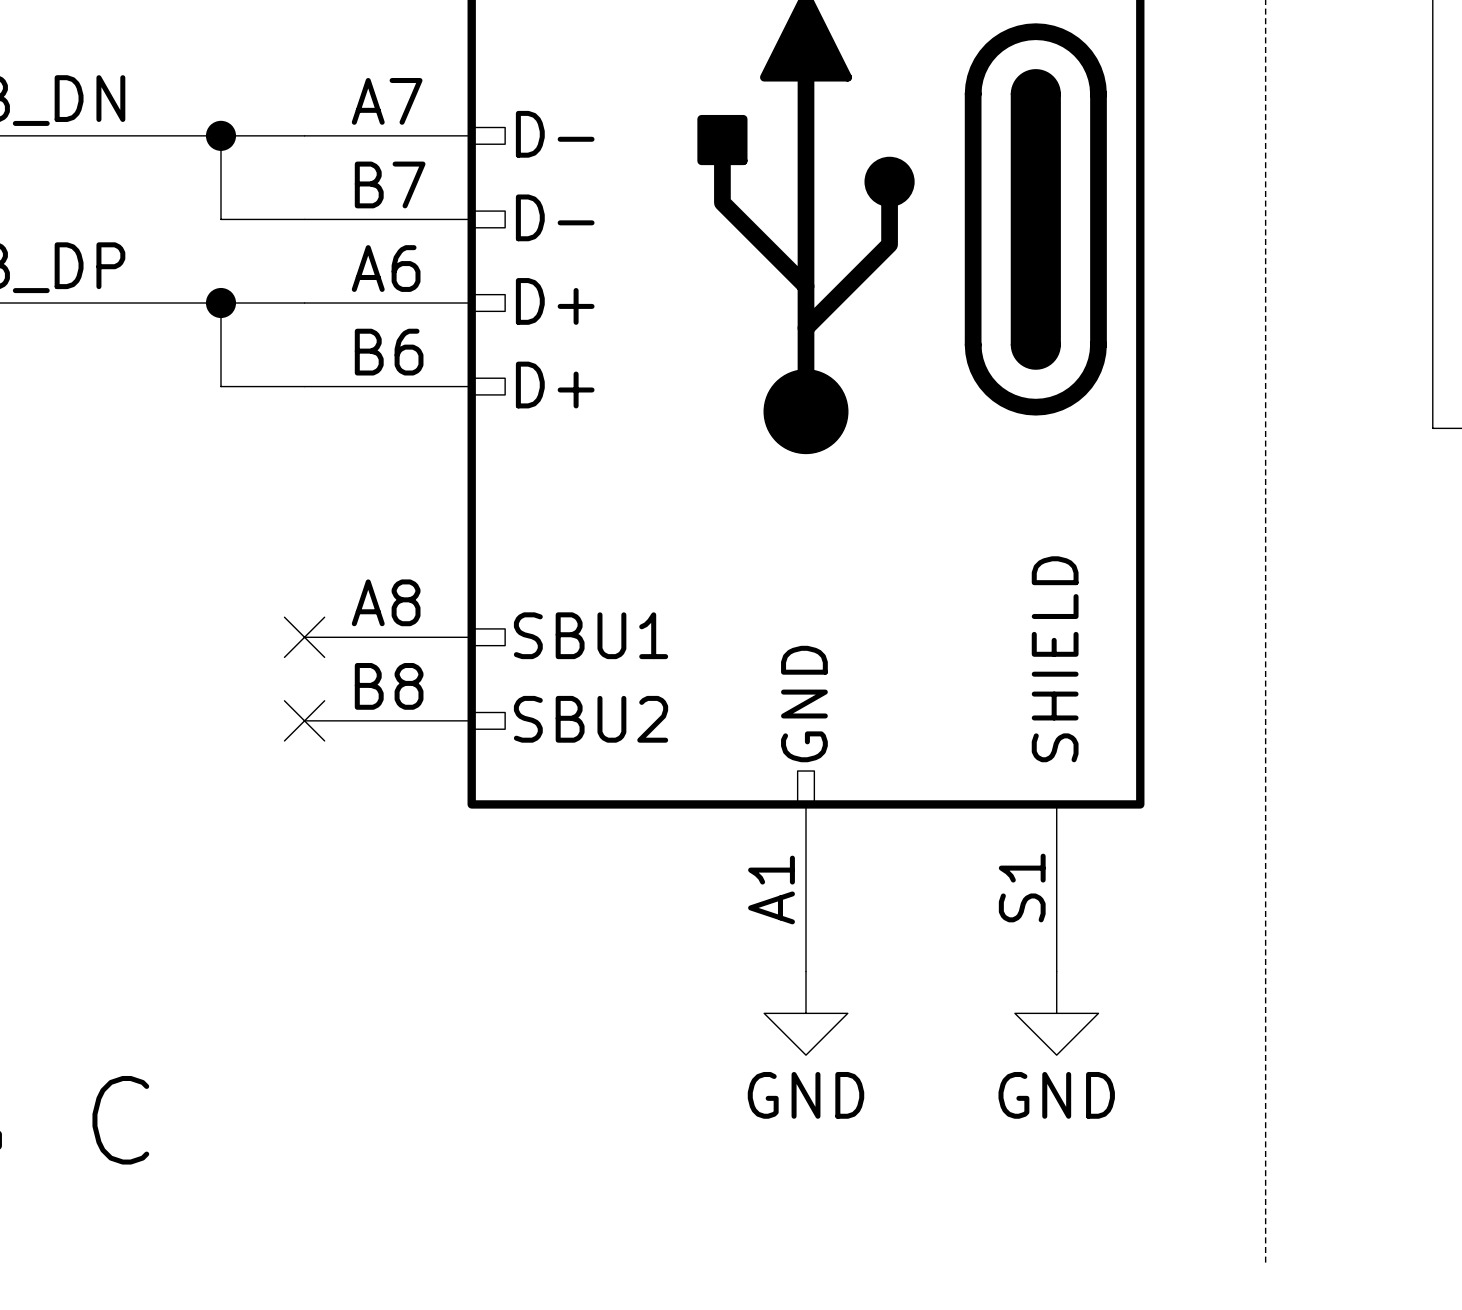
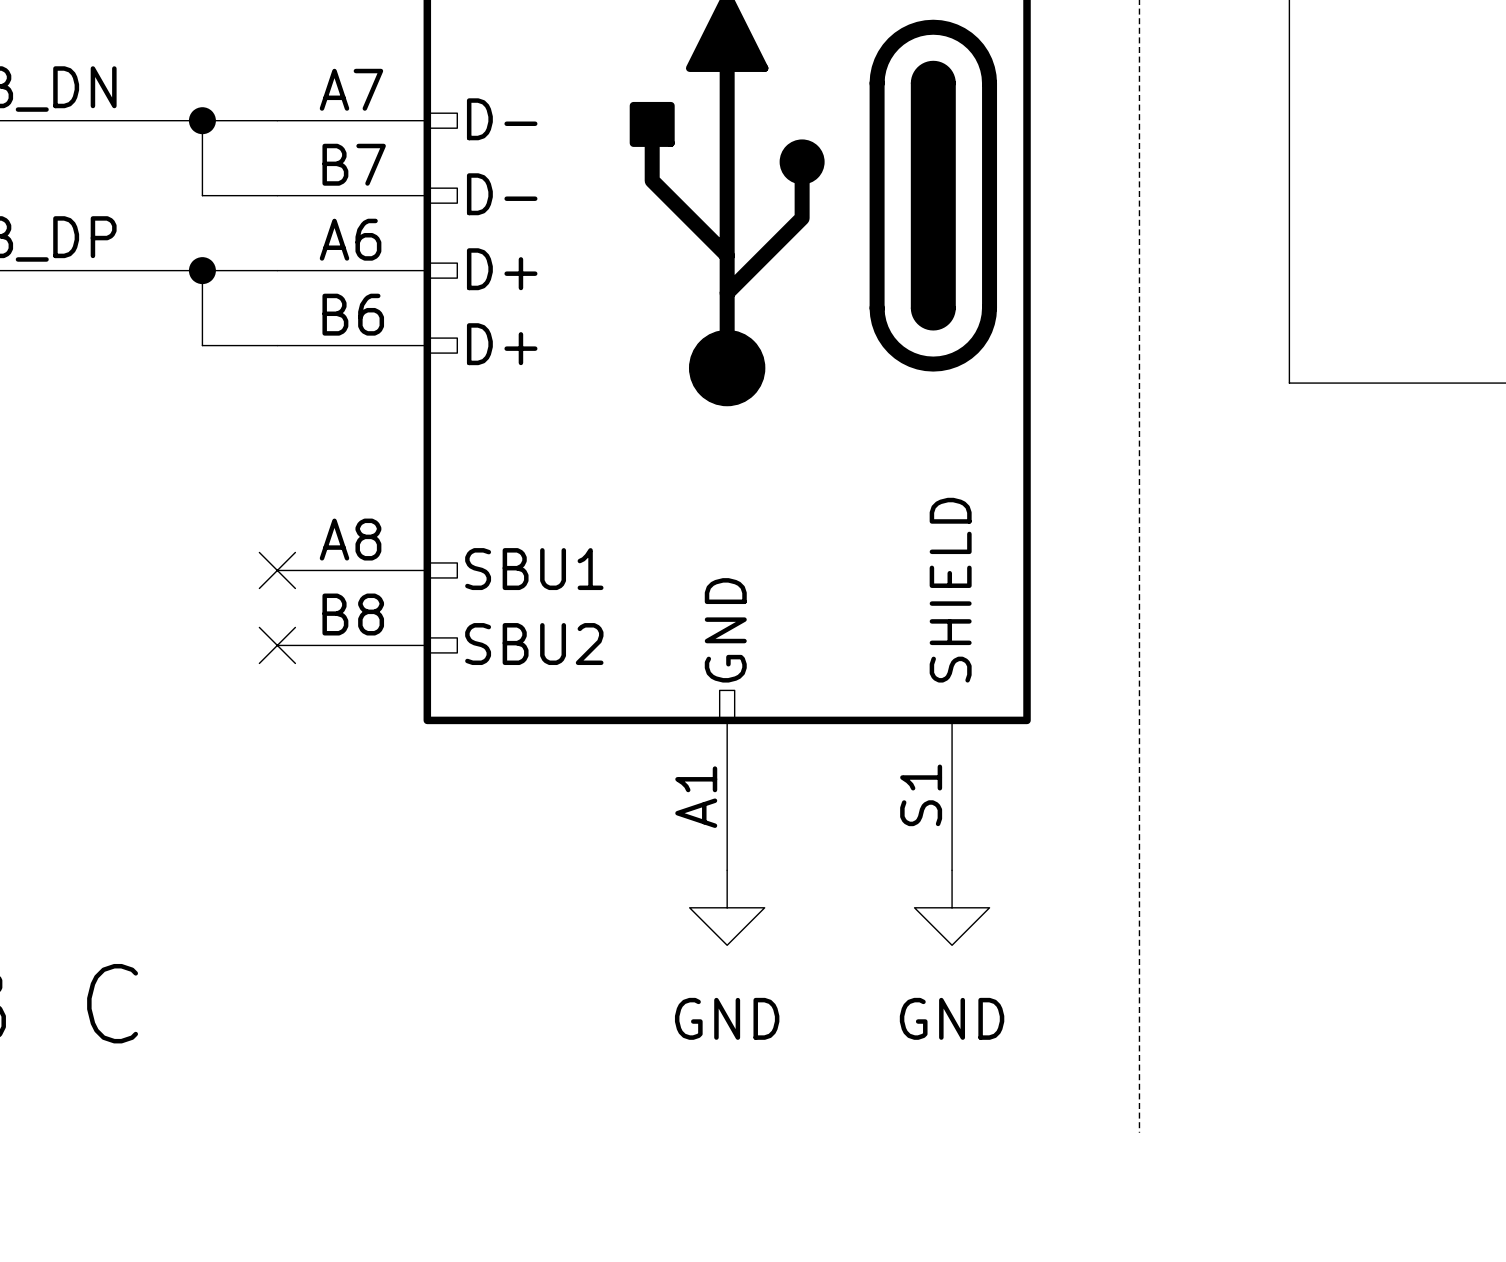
power symbol text position: GND (806, 1095) -> GND (727, 1018)
power symbol text position: GND (1056, 1095) -> GND (952, 1018)

